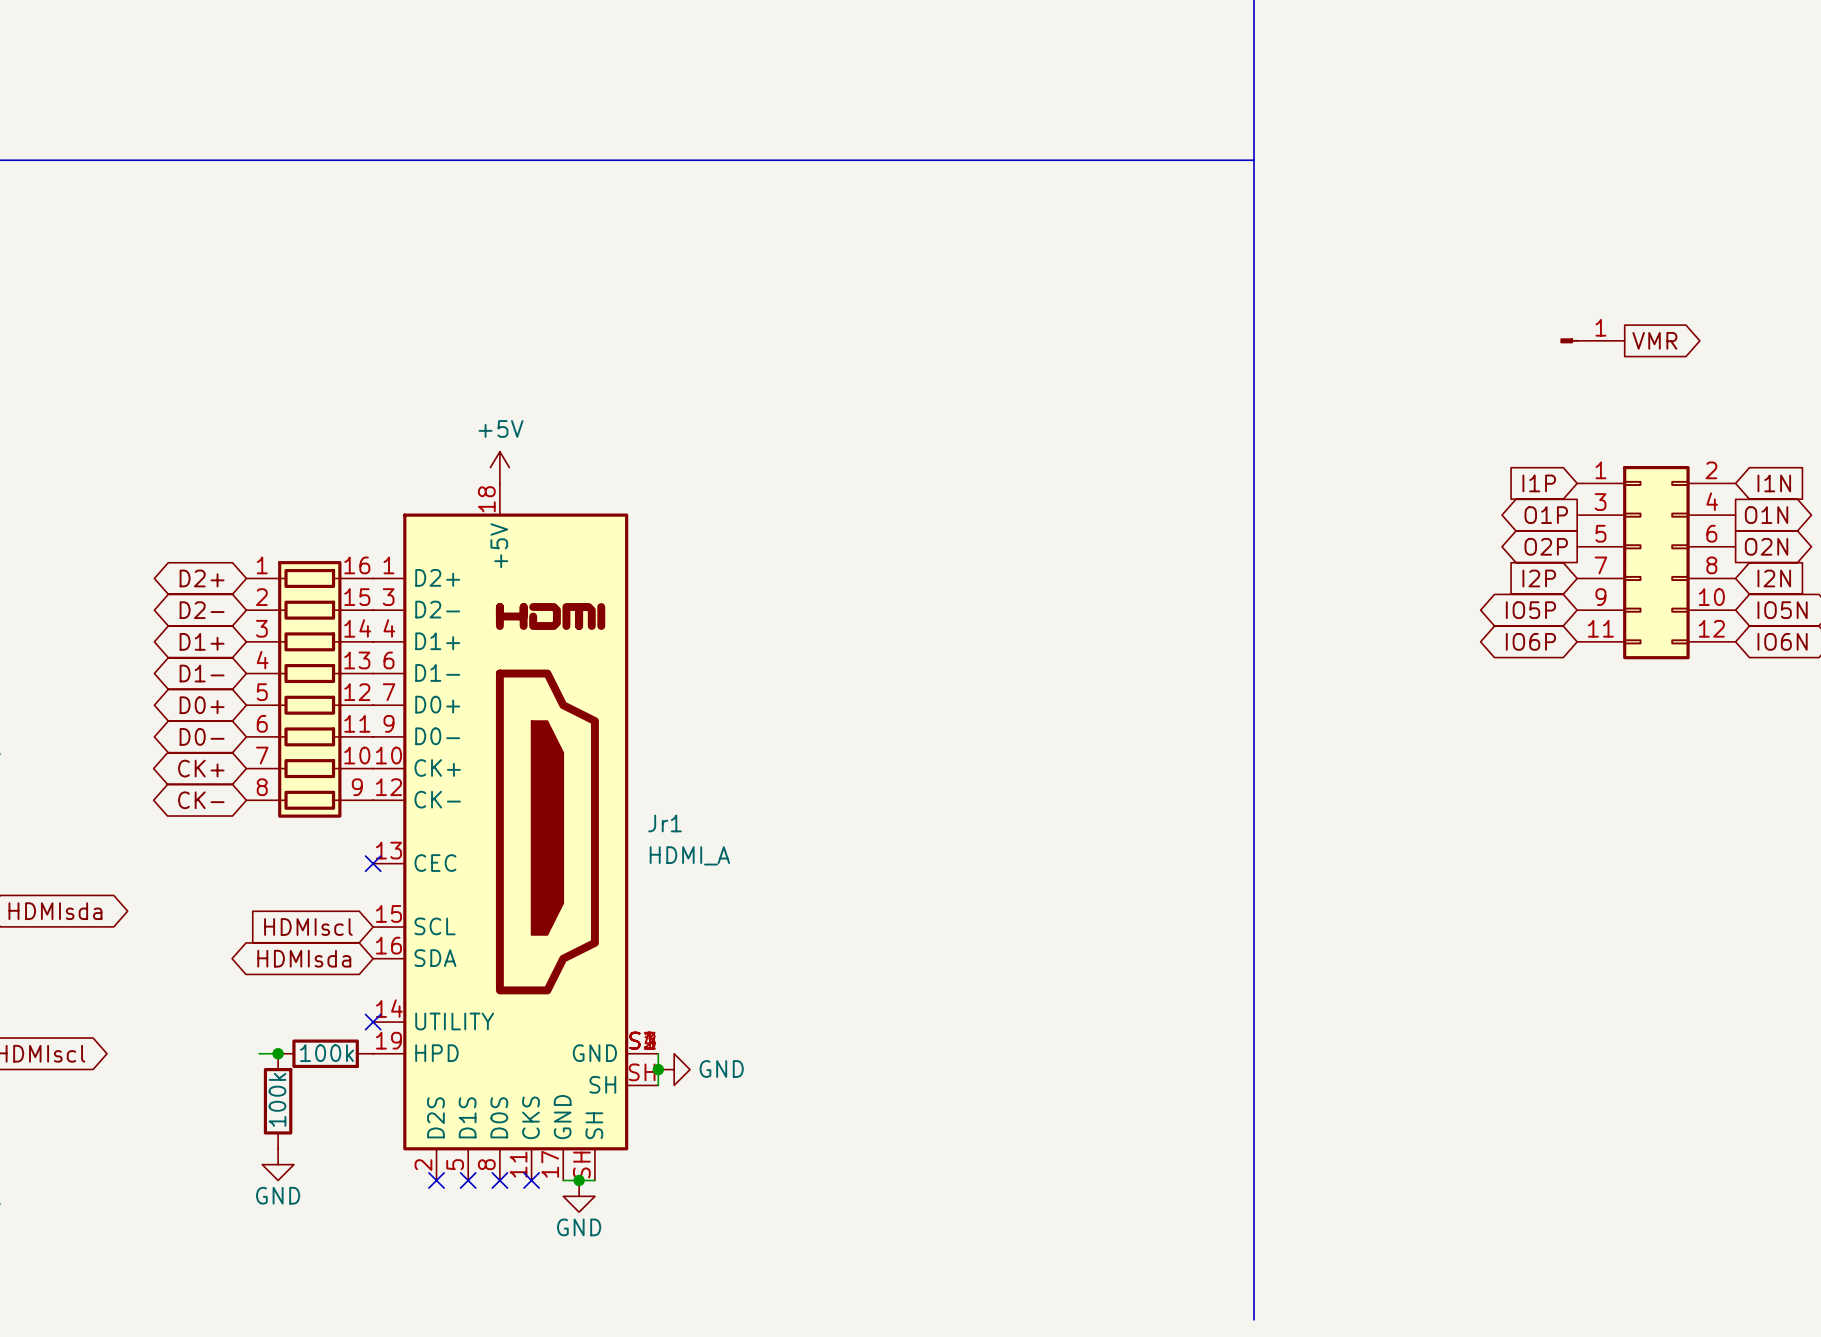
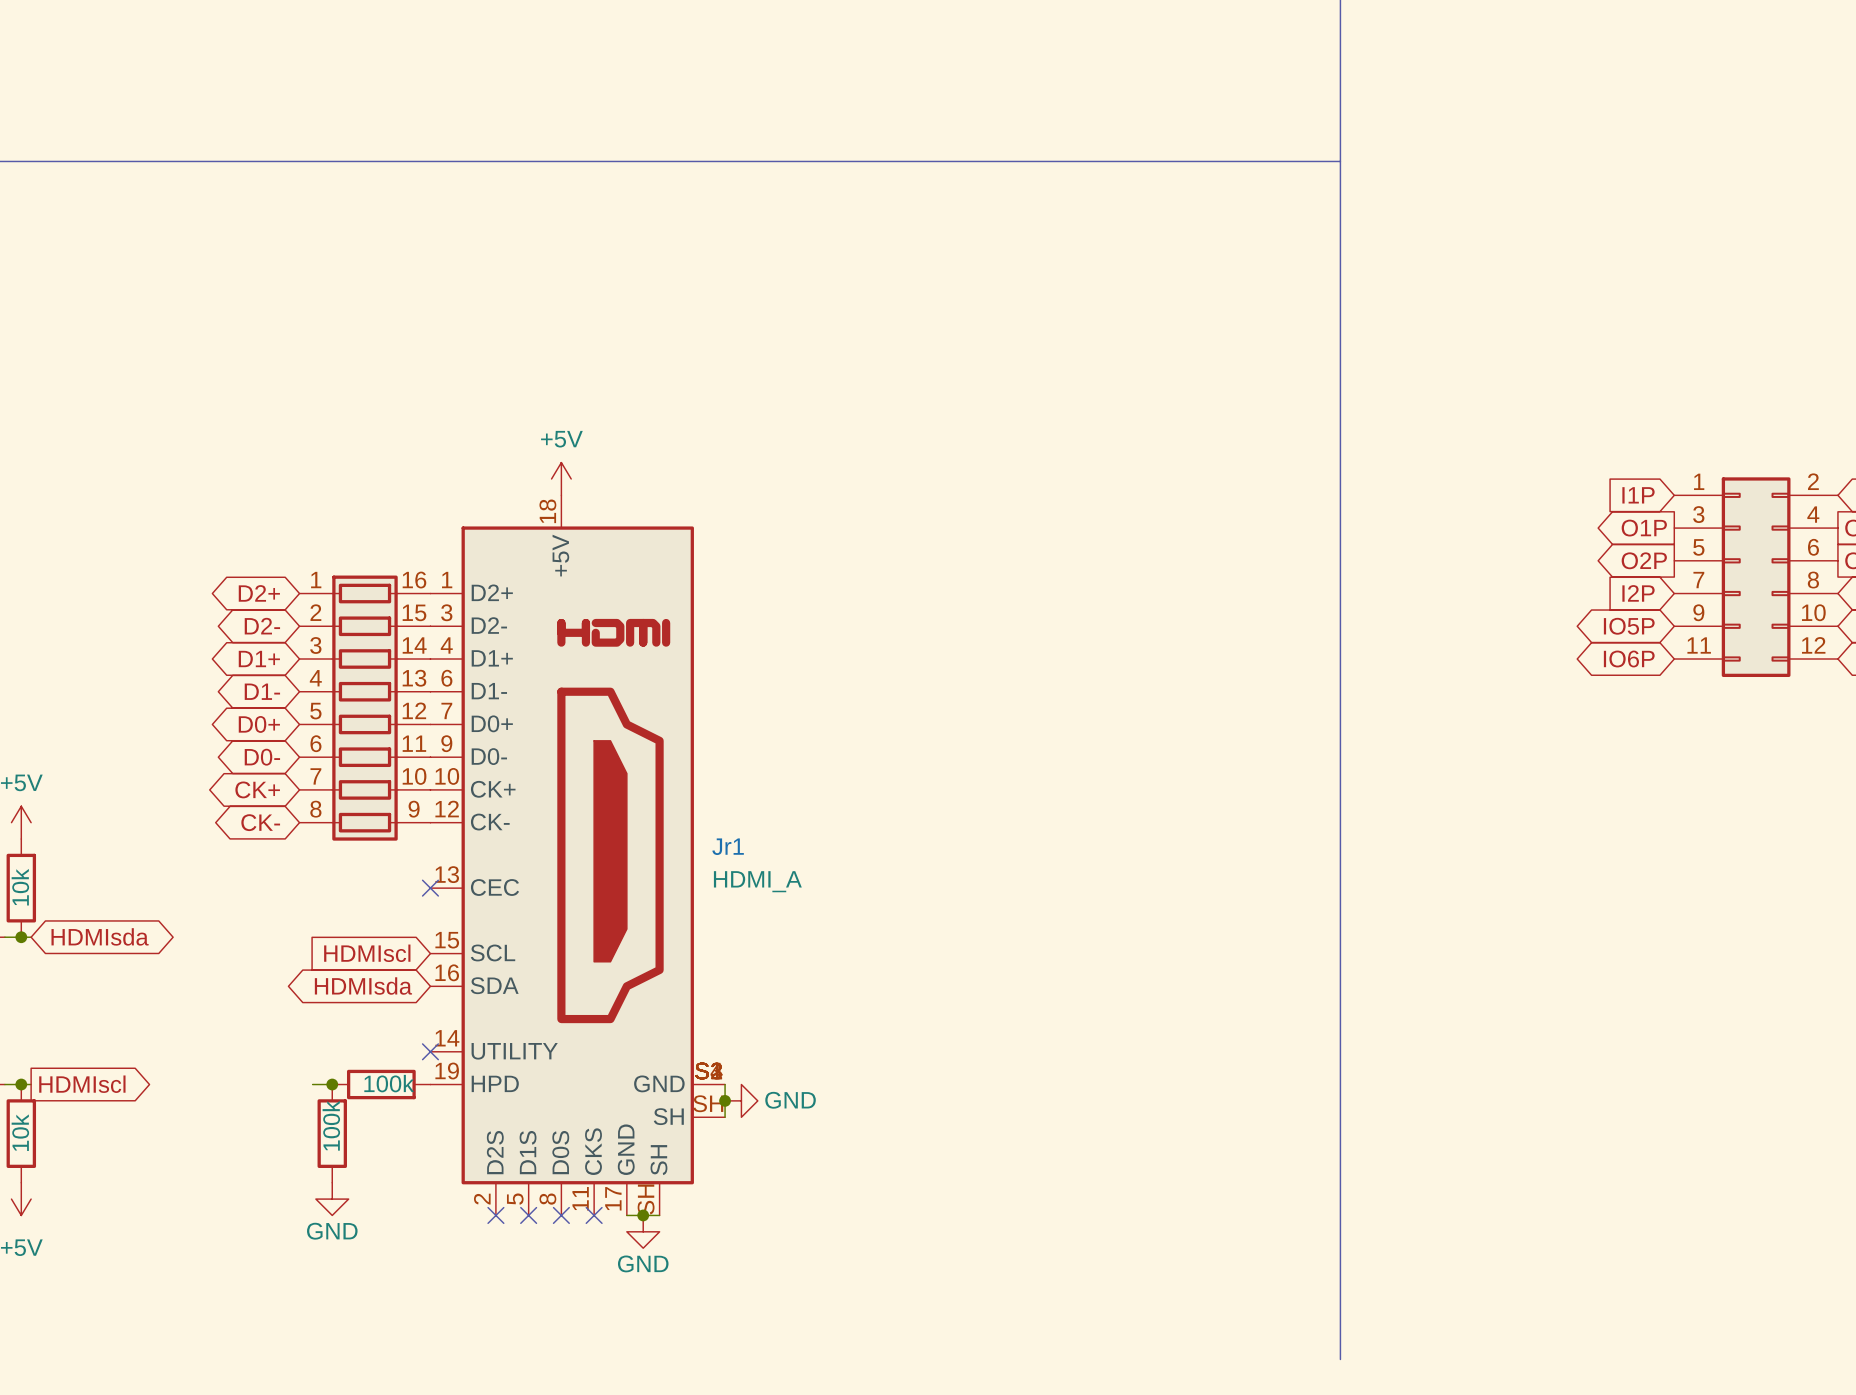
part: (1592, 340) -> none
global label: VMR (1654, 340) -> none

